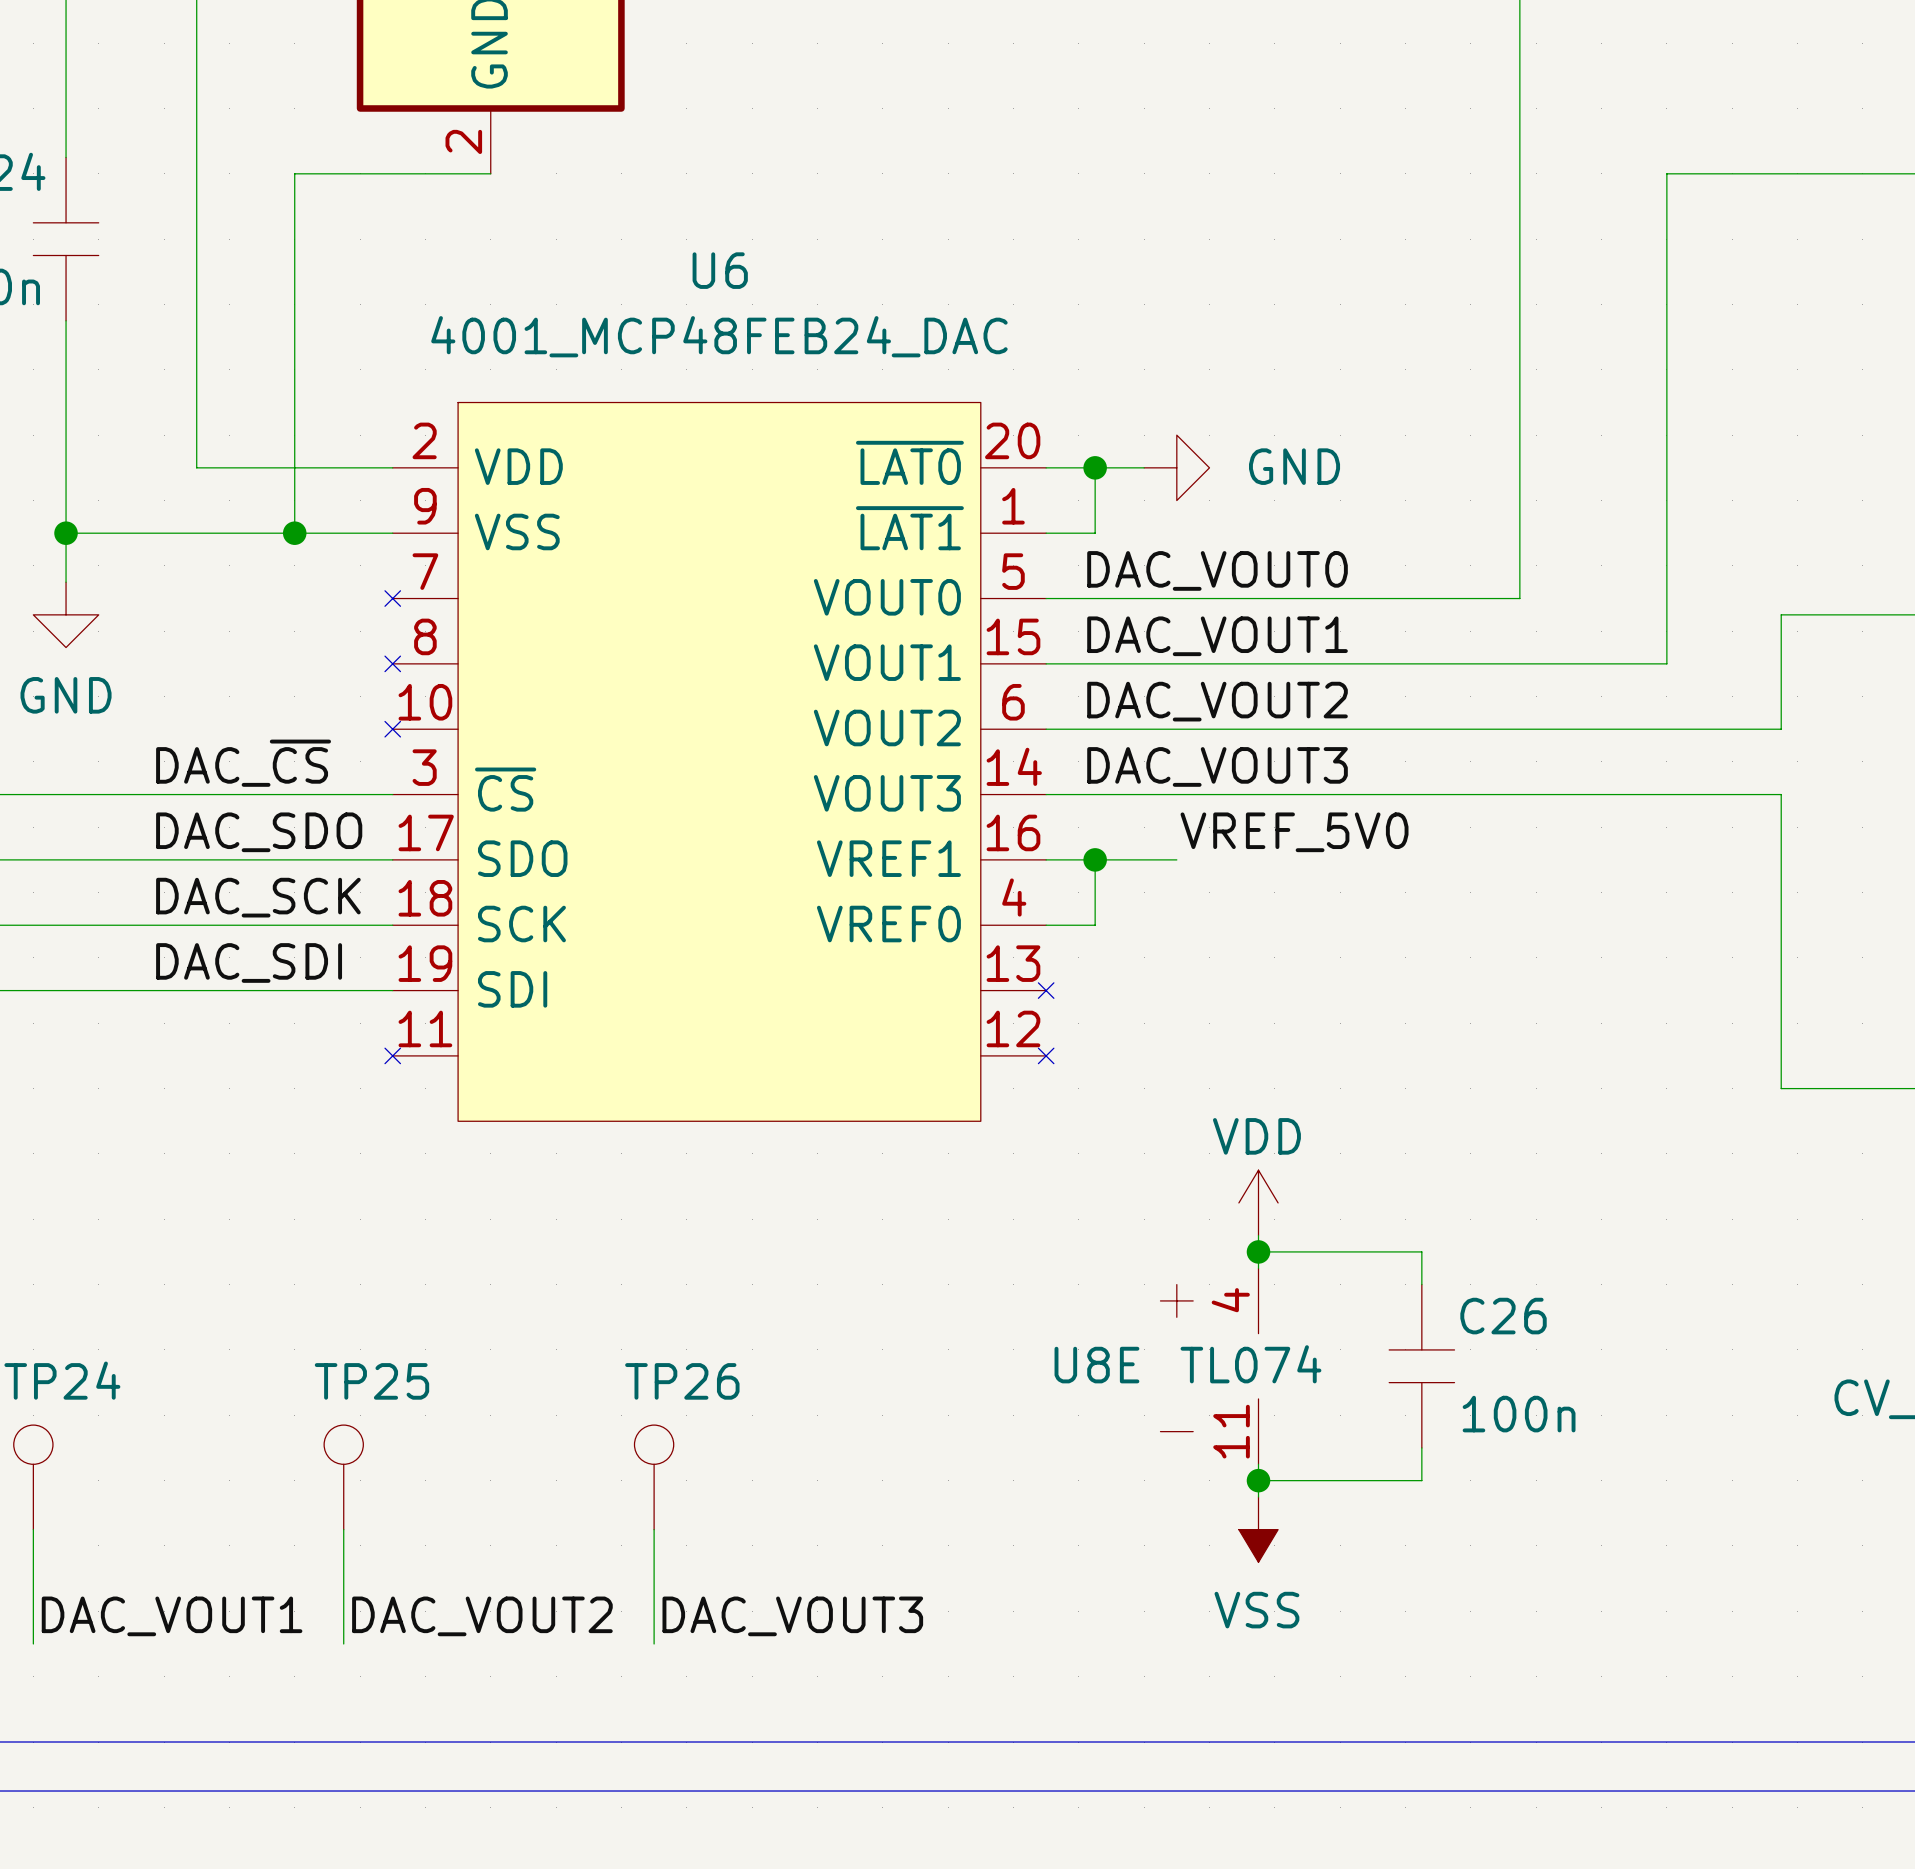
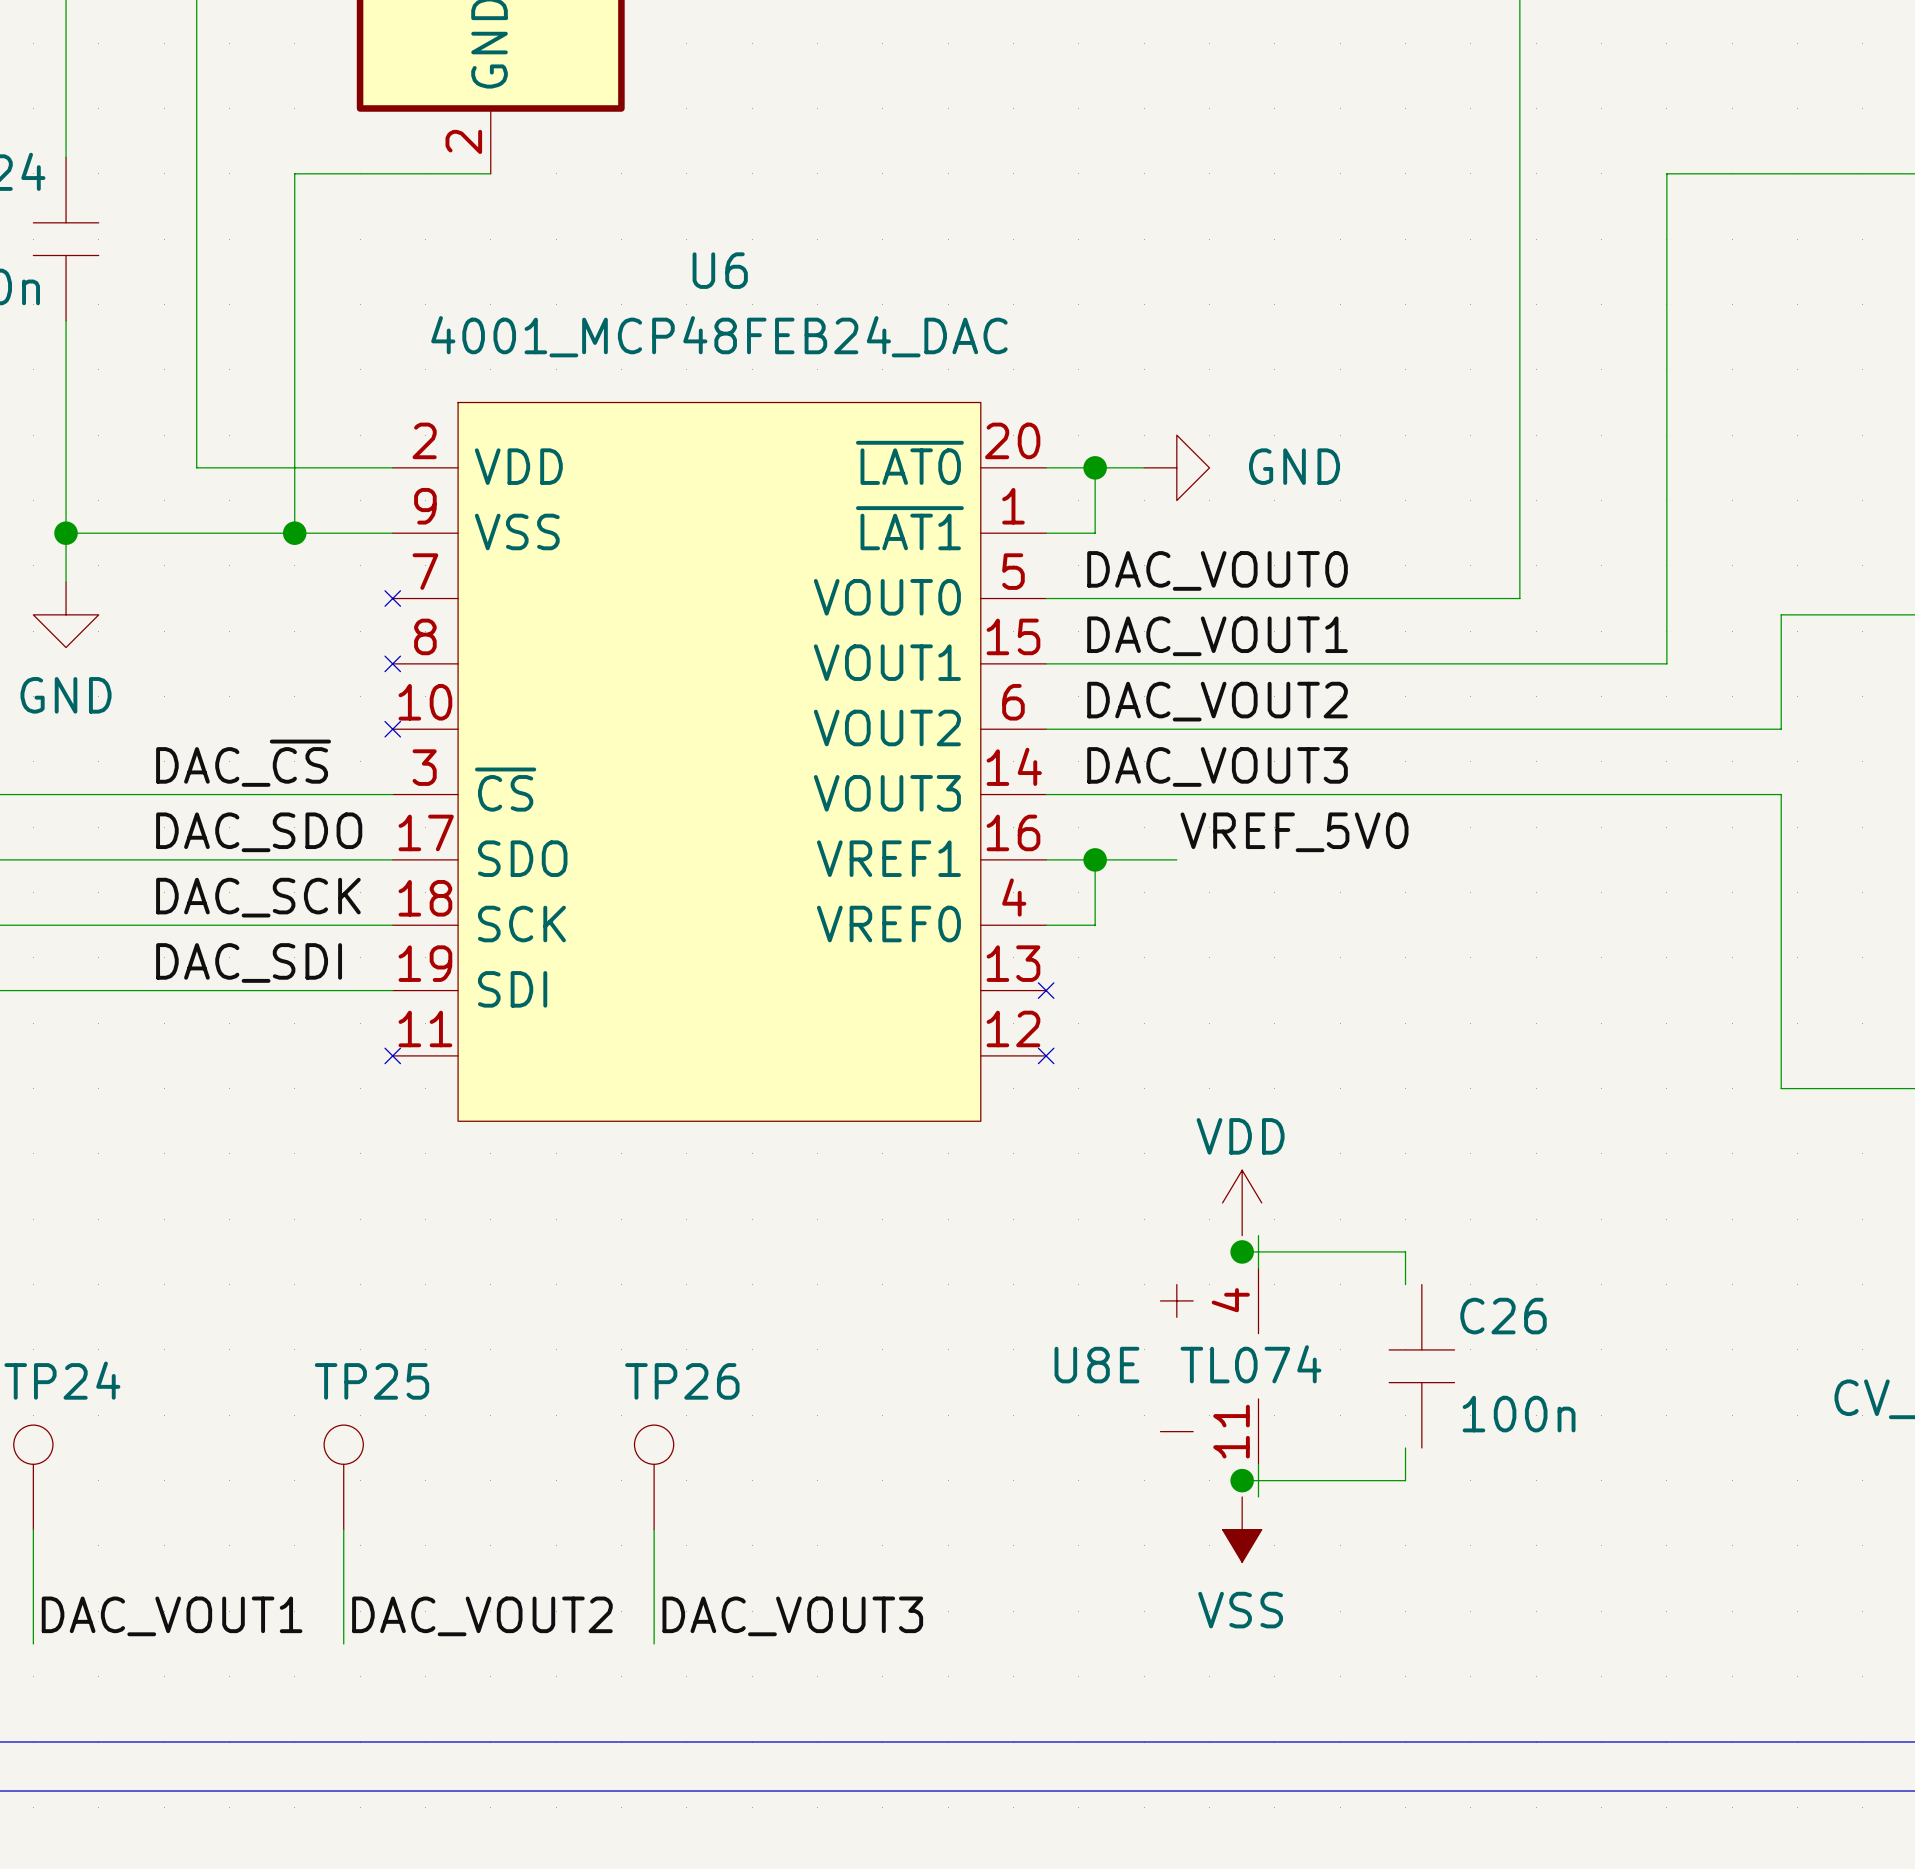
power symbol position: VDD (1258, 1202) -> VDD (1242, 1202)
junction position: (1258, 1251) -> (1242, 1251)
wire: (1405, 1251) (1421, 1251) (1421, 1284) -> (1405, 1251) (1405, 1284)
wire: (1421, 1447) (1421, 1480) (1405, 1480) -> (1405, 1447) (1405, 1480)
junction position: (1258, 1480) -> (1242, 1480)
power symbol position: VSS (1258, 1529) -> VSS (1242, 1529)

